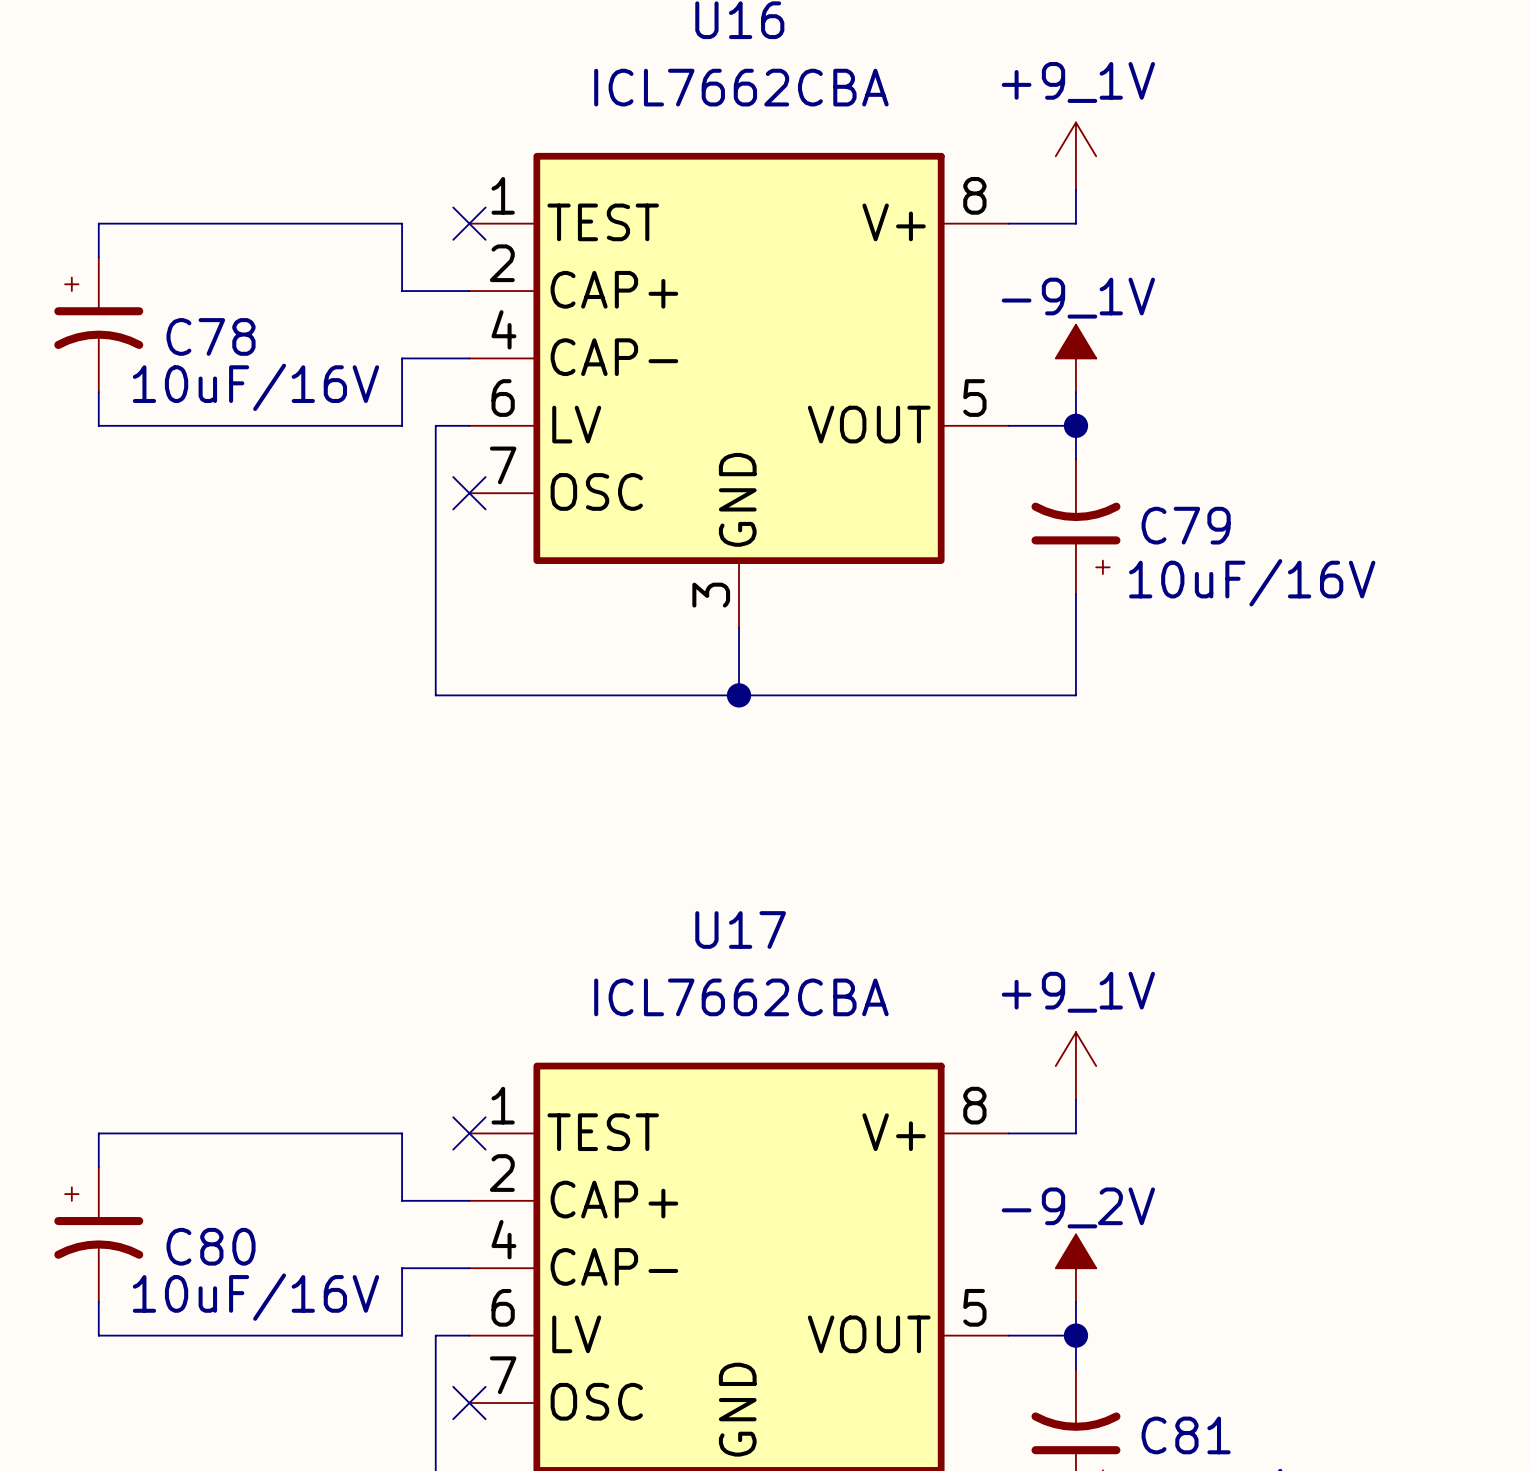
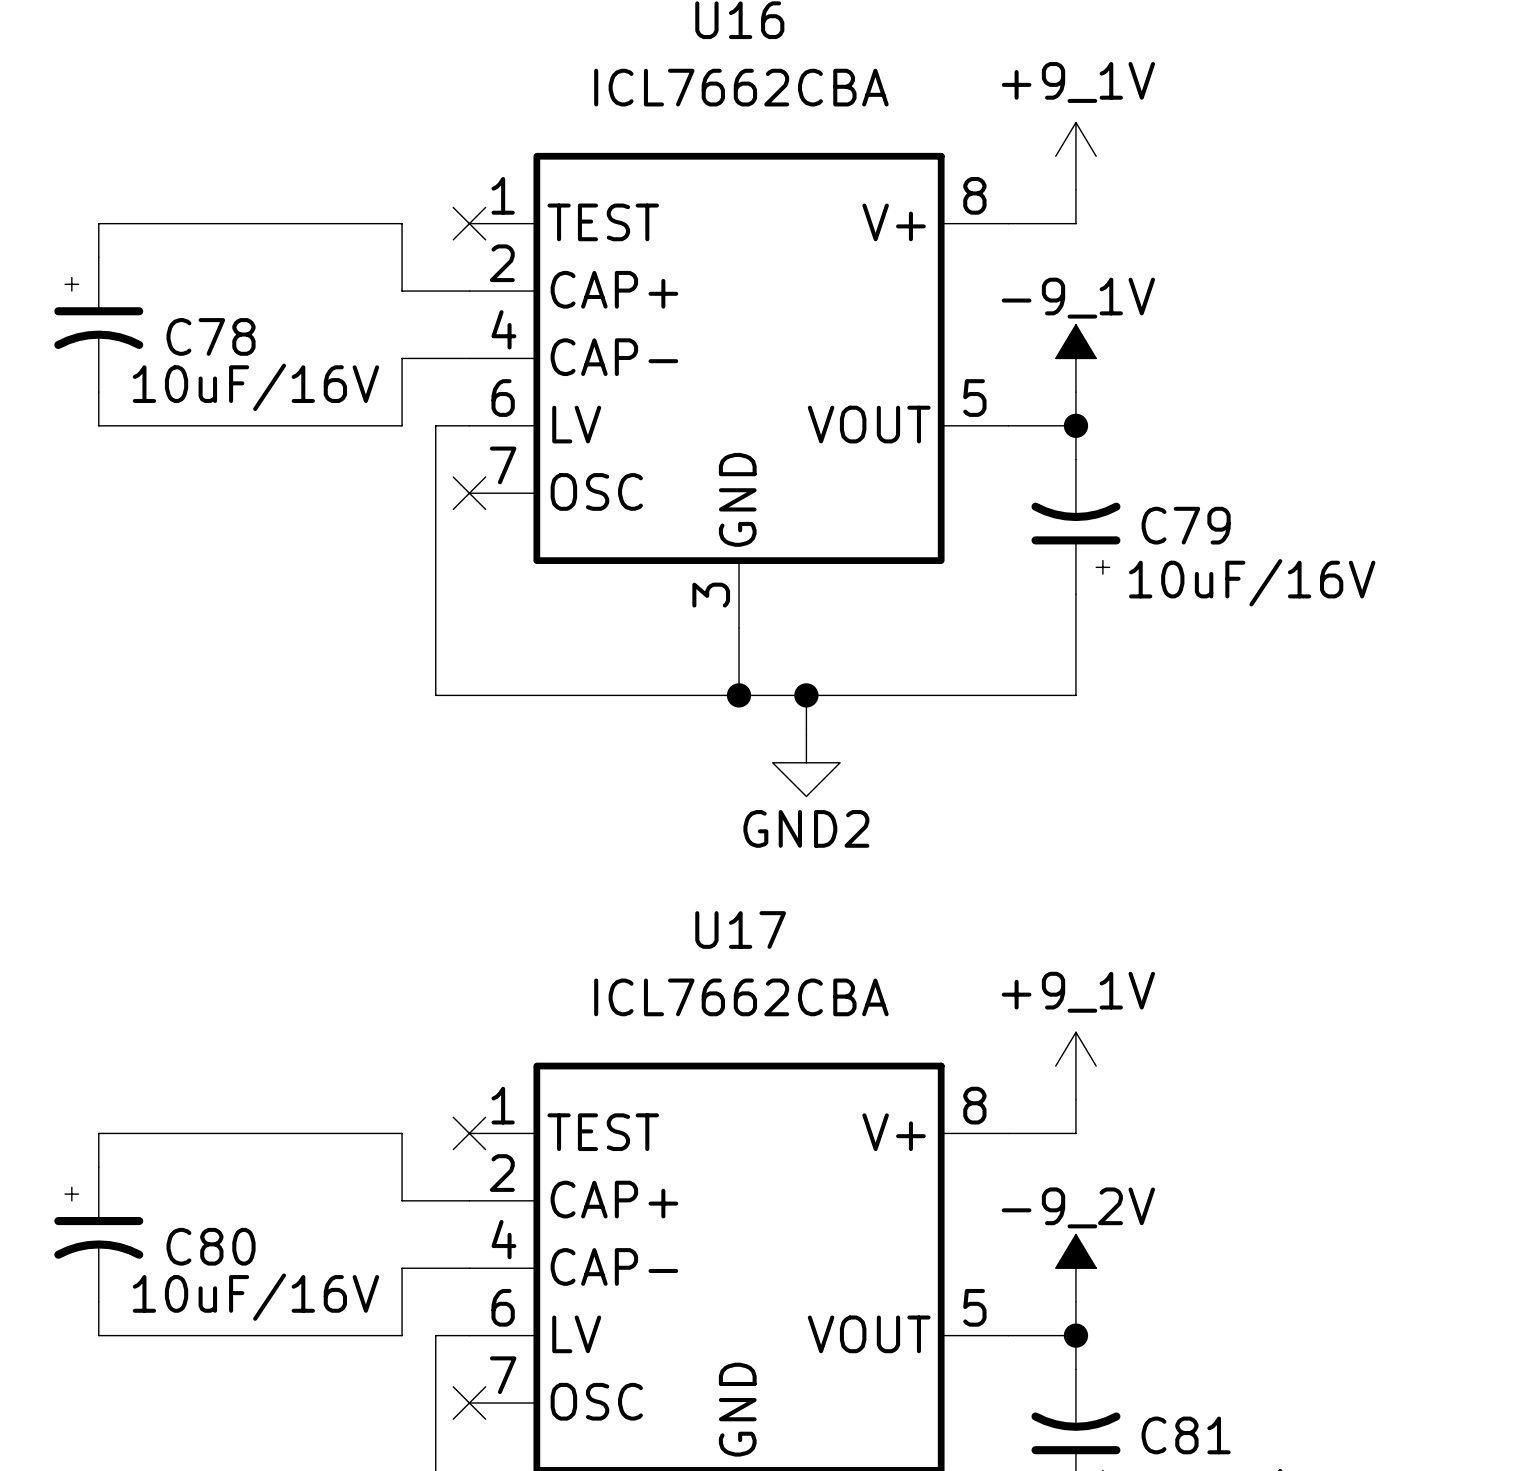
wire: none -> (806, 695) (806, 729)
junction: none -> (806, 695)
power symbol: none -> GND2 (806, 762)

